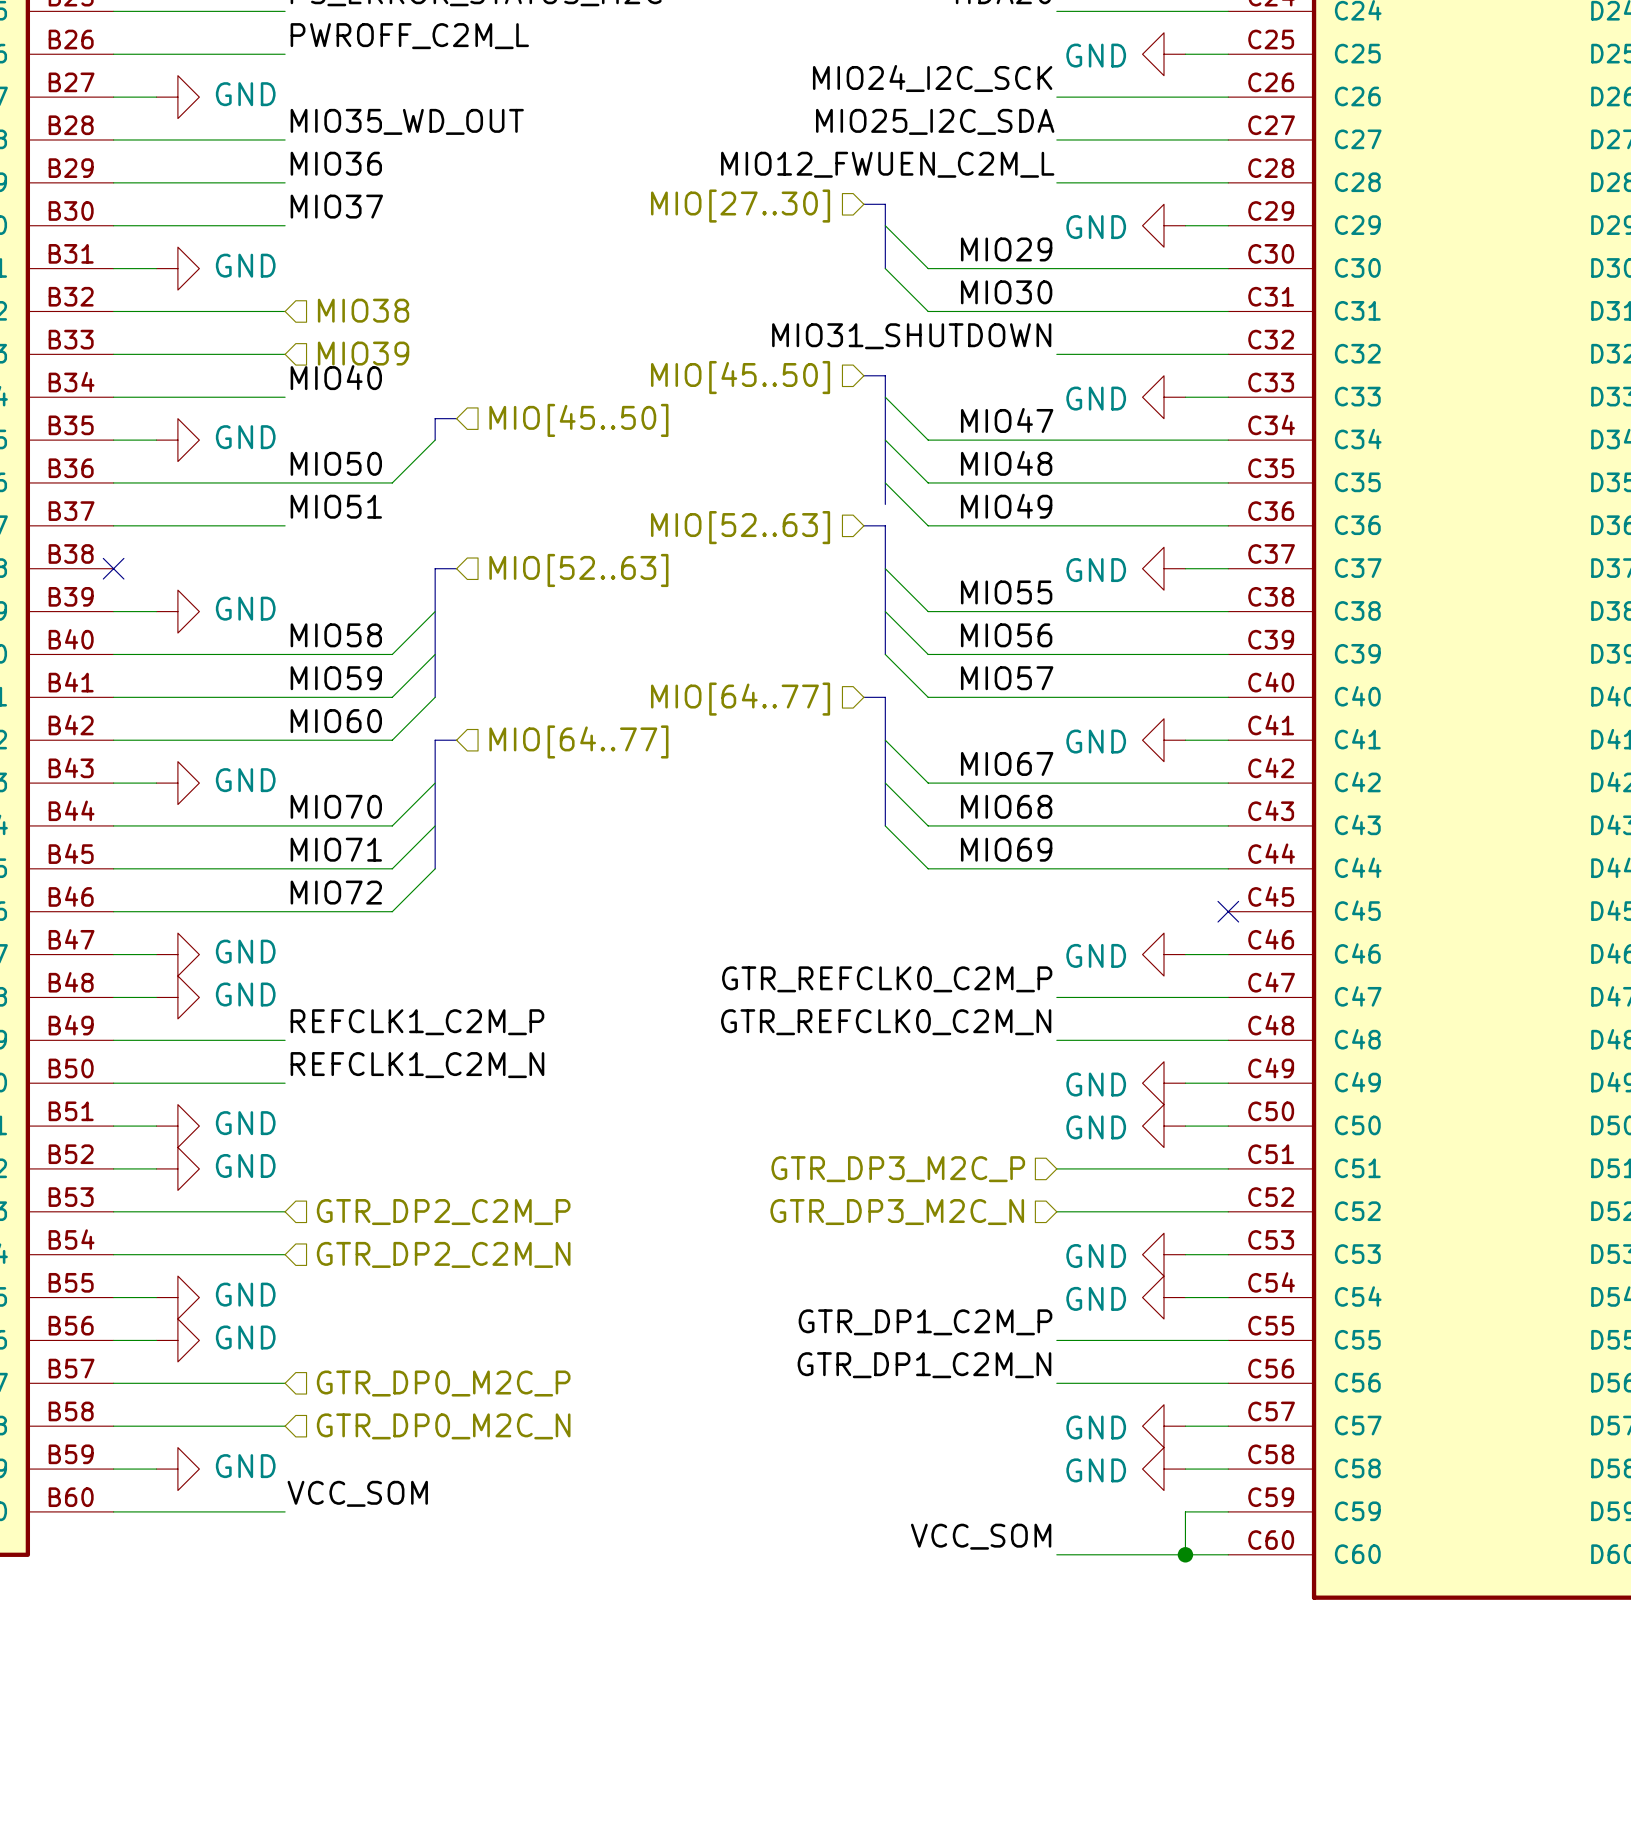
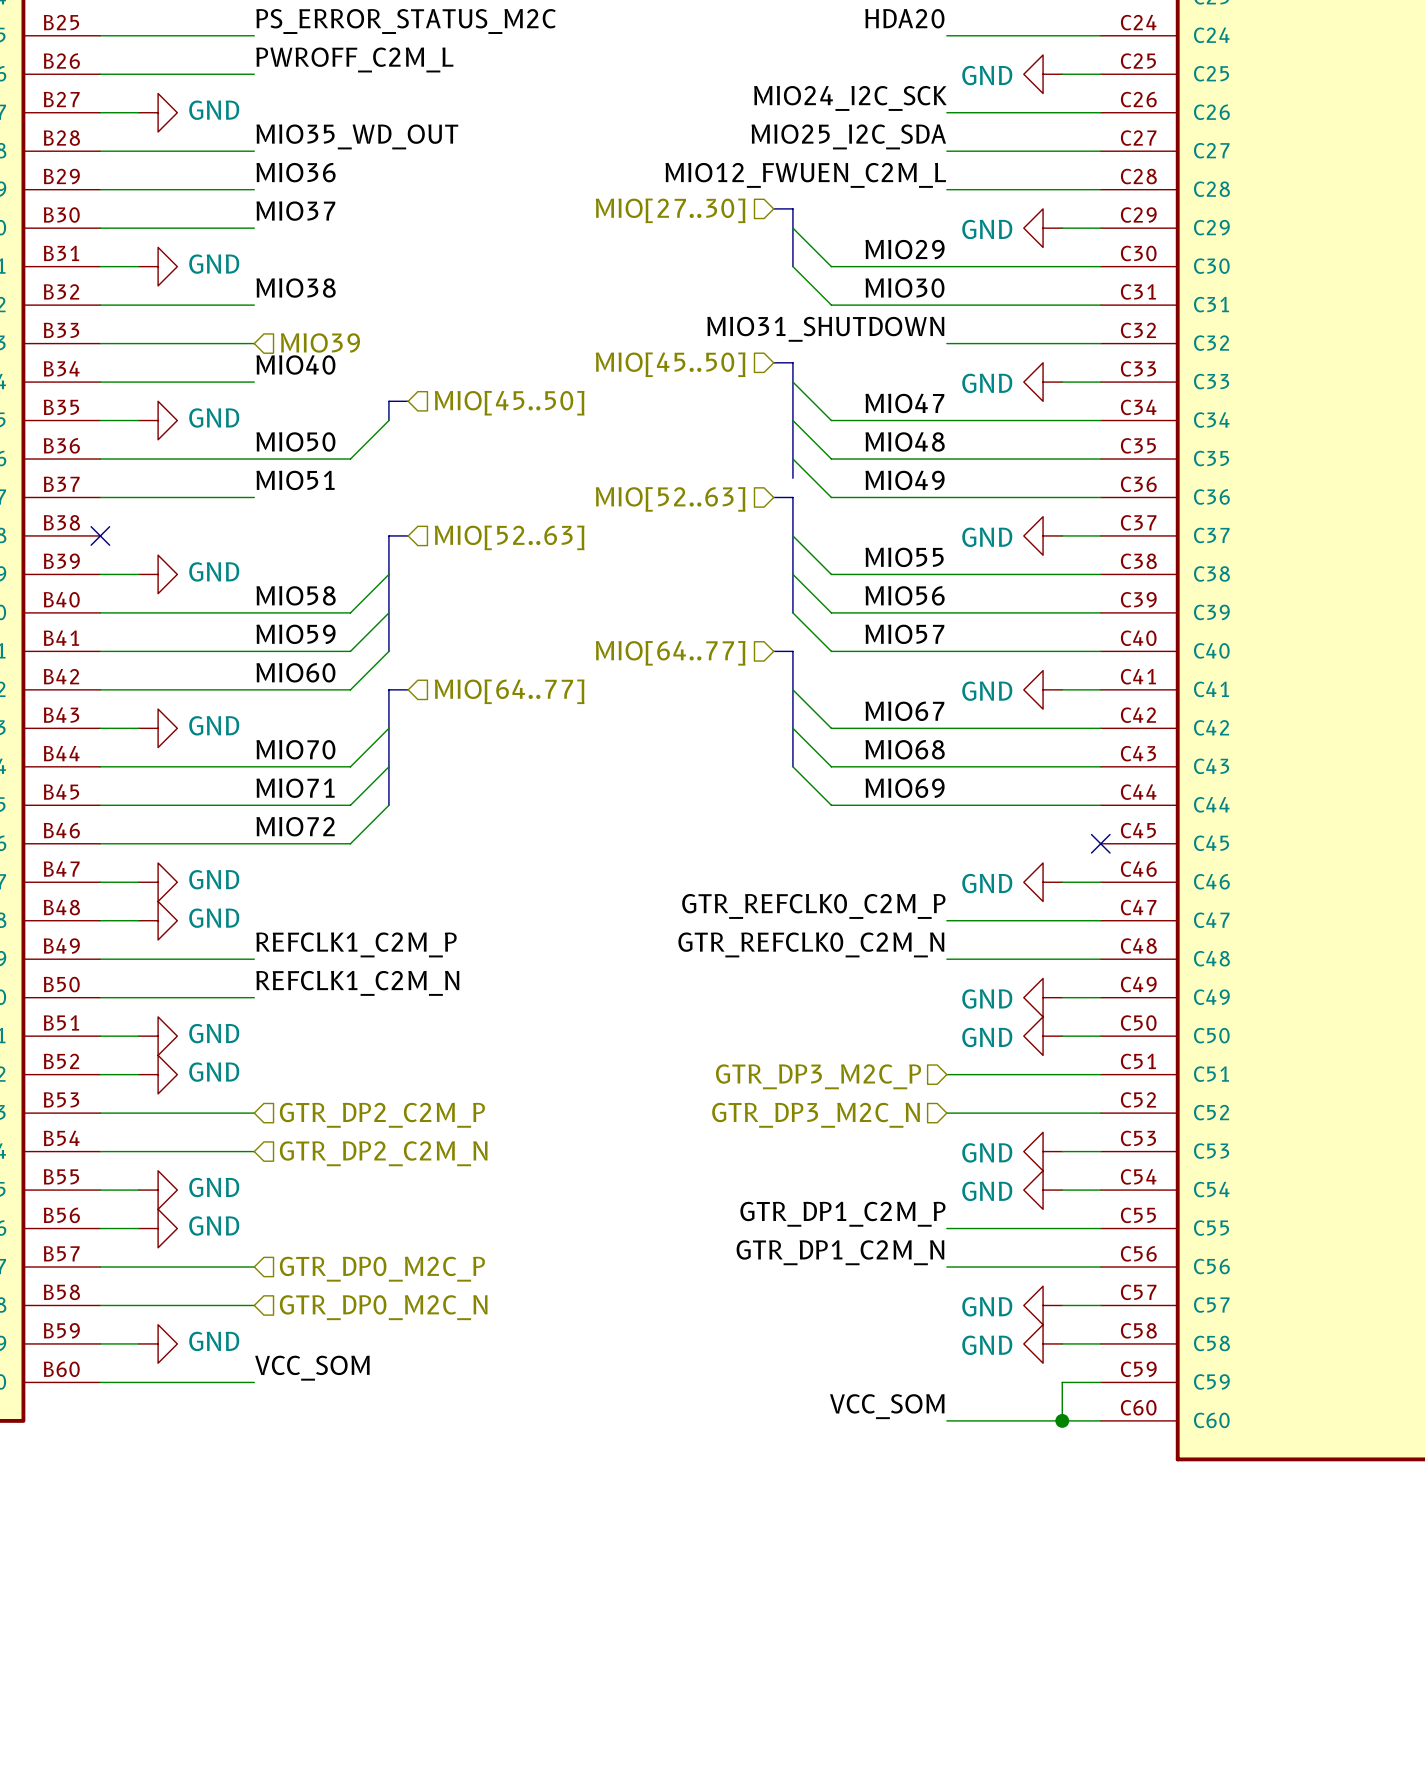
label: none -> MIO38 (296, 288)
hierarchical label: MIO38 (363, 310) -> none

